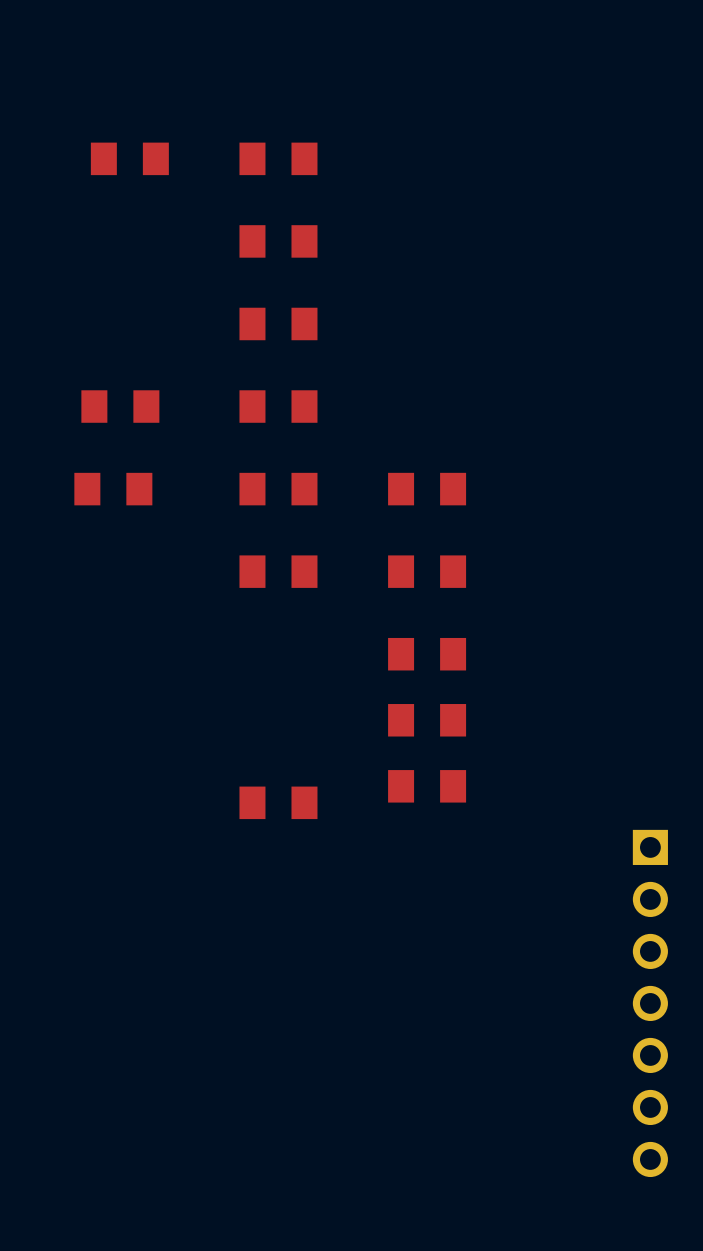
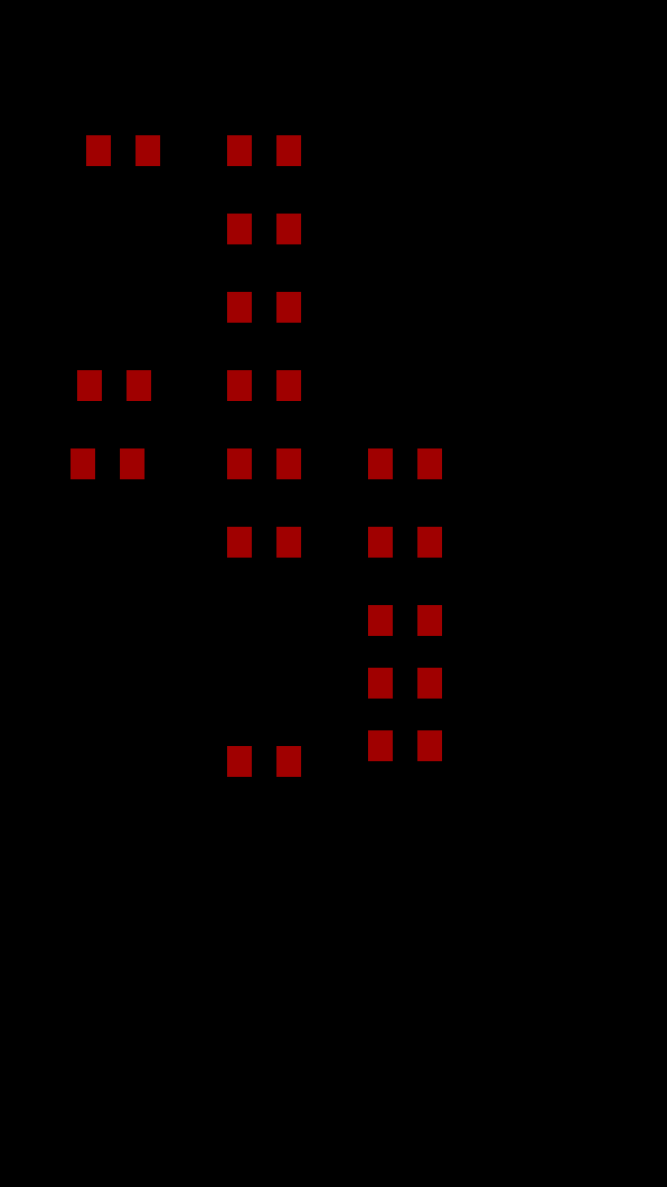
part: (650, 1003) -> none

